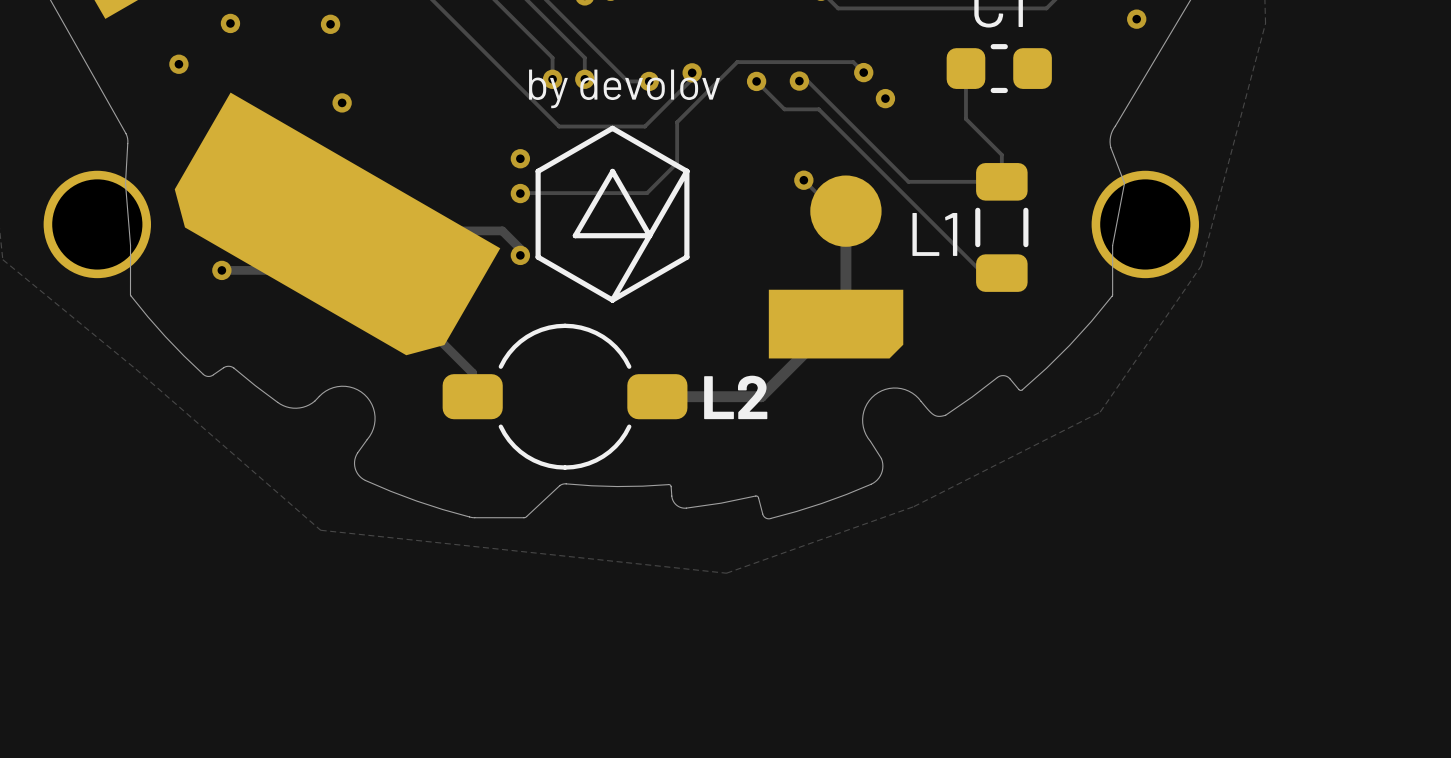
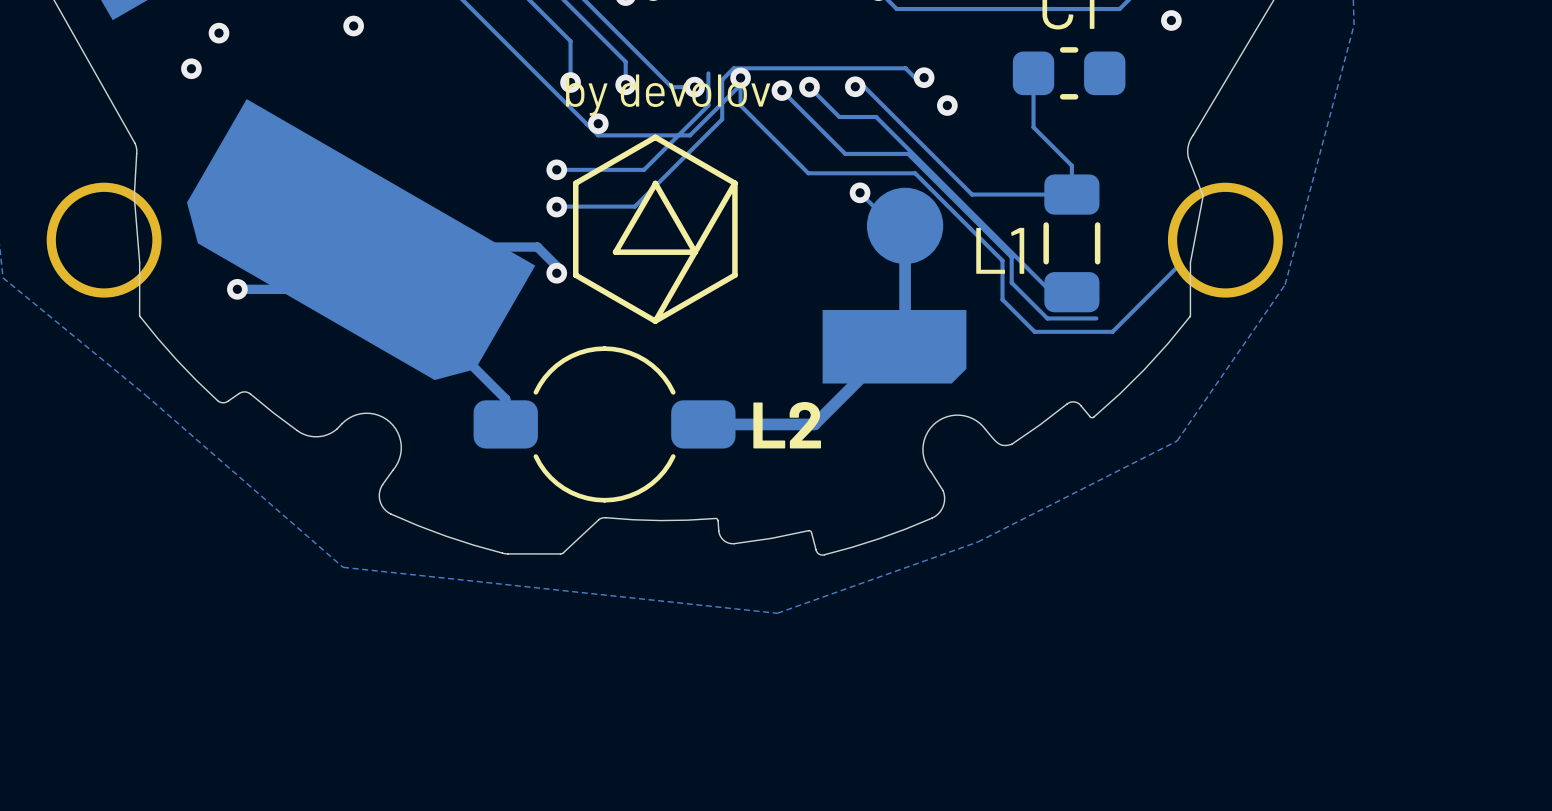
via position: (1136, 19) -> (1171, 20)
via position: (230, 23) -> (219, 33)
track: (533, 38) (552, 57) (552, 79) -> (570, 41) (570, 82)
track: none -> (708, 73) (708, 105) (644, 169) (556, 169)
track: (863, 72) (853, 62) (737, 62) (677, 122) (677, 163) (647, 193) (593, 193) -> (919, 82) (905, 68) (733, 68) (722, 79) (722, 119) (634, 206)
via position: (552, 79) -> (570, 82)
track: none -> (740, 84) (740, 105) (808, 173) (915, 173) (1002, 260) (1002, 299) (1034, 331) (1112, 331) (1184, 259) (1189, 233)
track: none -> (781, 90) (845, 153) (908, 153) (1011, 257) (1011, 282) (1047, 318) (1096, 318)
via: none -> (781, 90)
via: (342, 102) -> none
via: none -> (598, 123)

